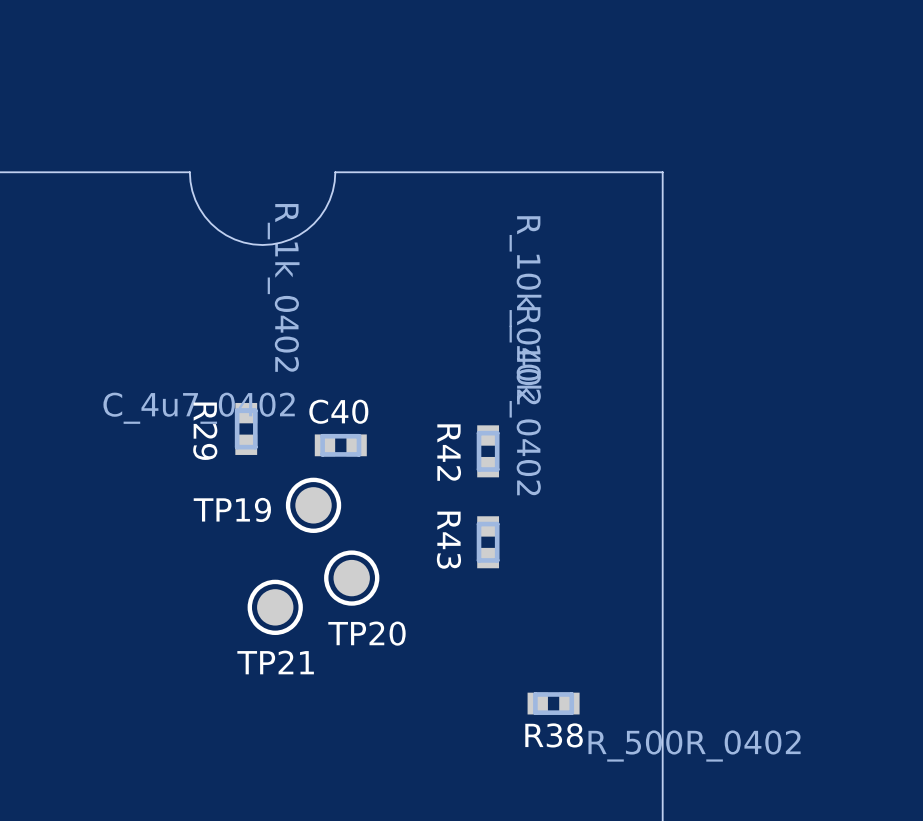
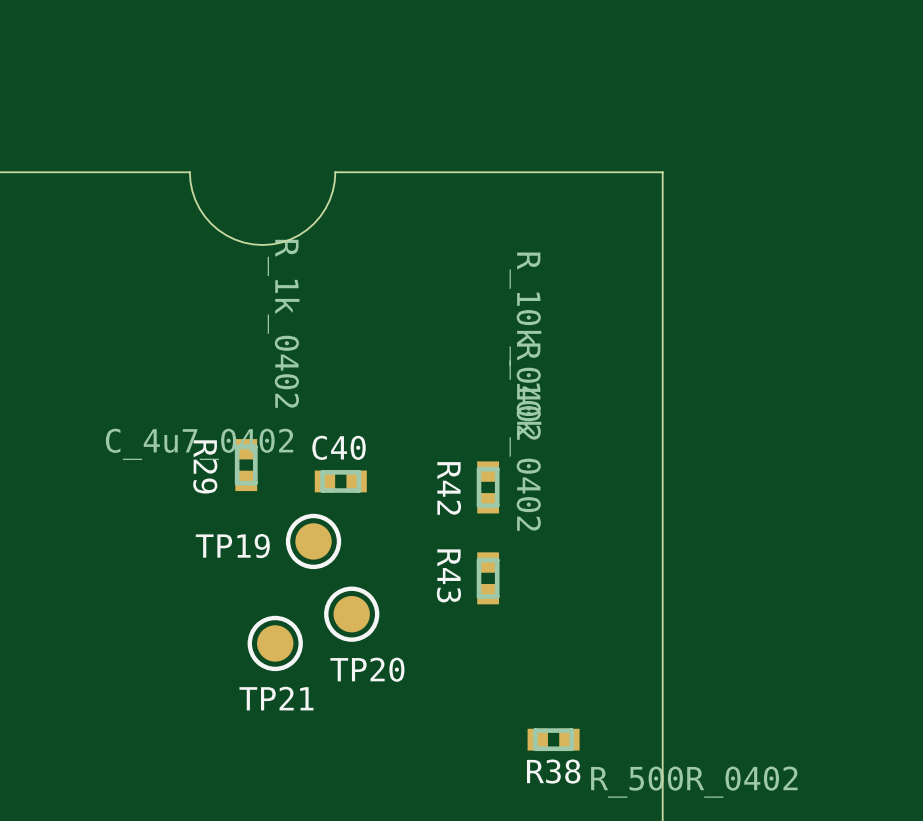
R29 position: (246, 428) -> (246, 465)
C40 position: (340, 445) -> (340, 481)
R42 position: (488, 451) -> (488, 487)
TP19 position: (313, 505) -> (313, 541)
R43 position: (488, 542) -> (488, 578)
TP20 position: (351, 578) -> (351, 614)
TP21 position: (275, 607) -> (275, 643)
R38 position: (553, 703) -> (553, 739)

